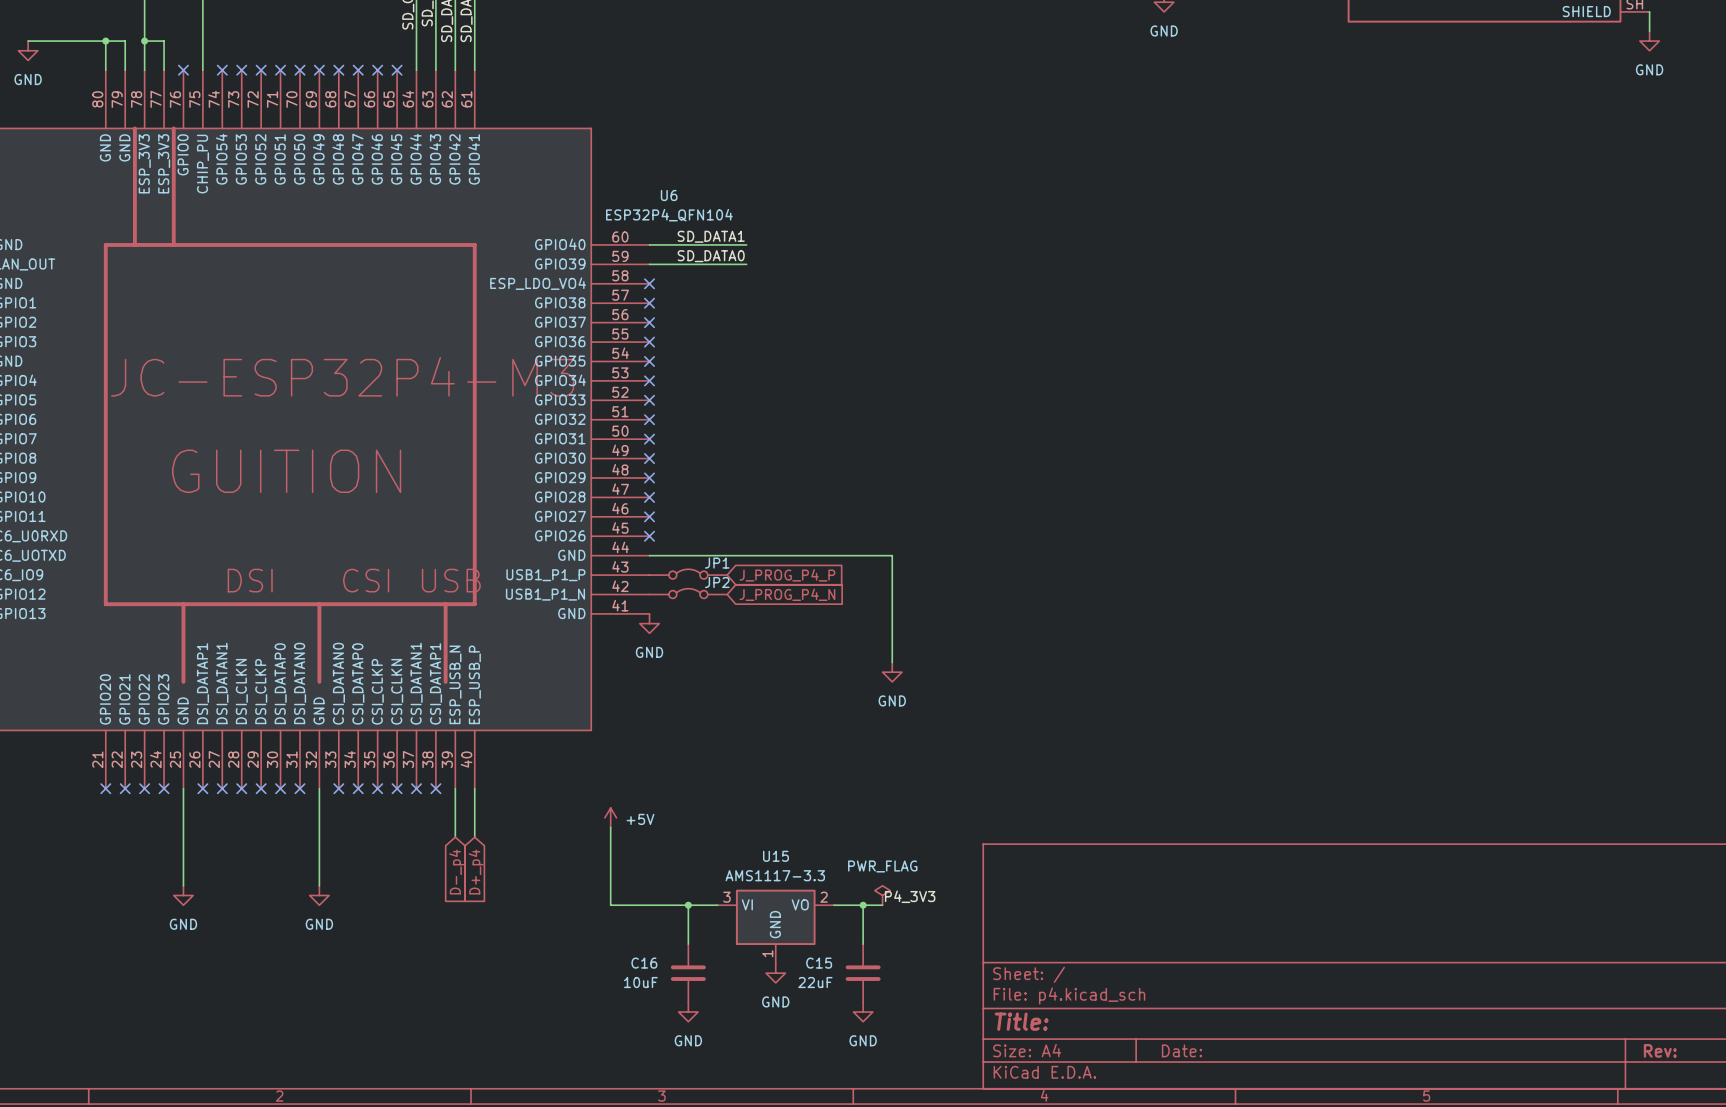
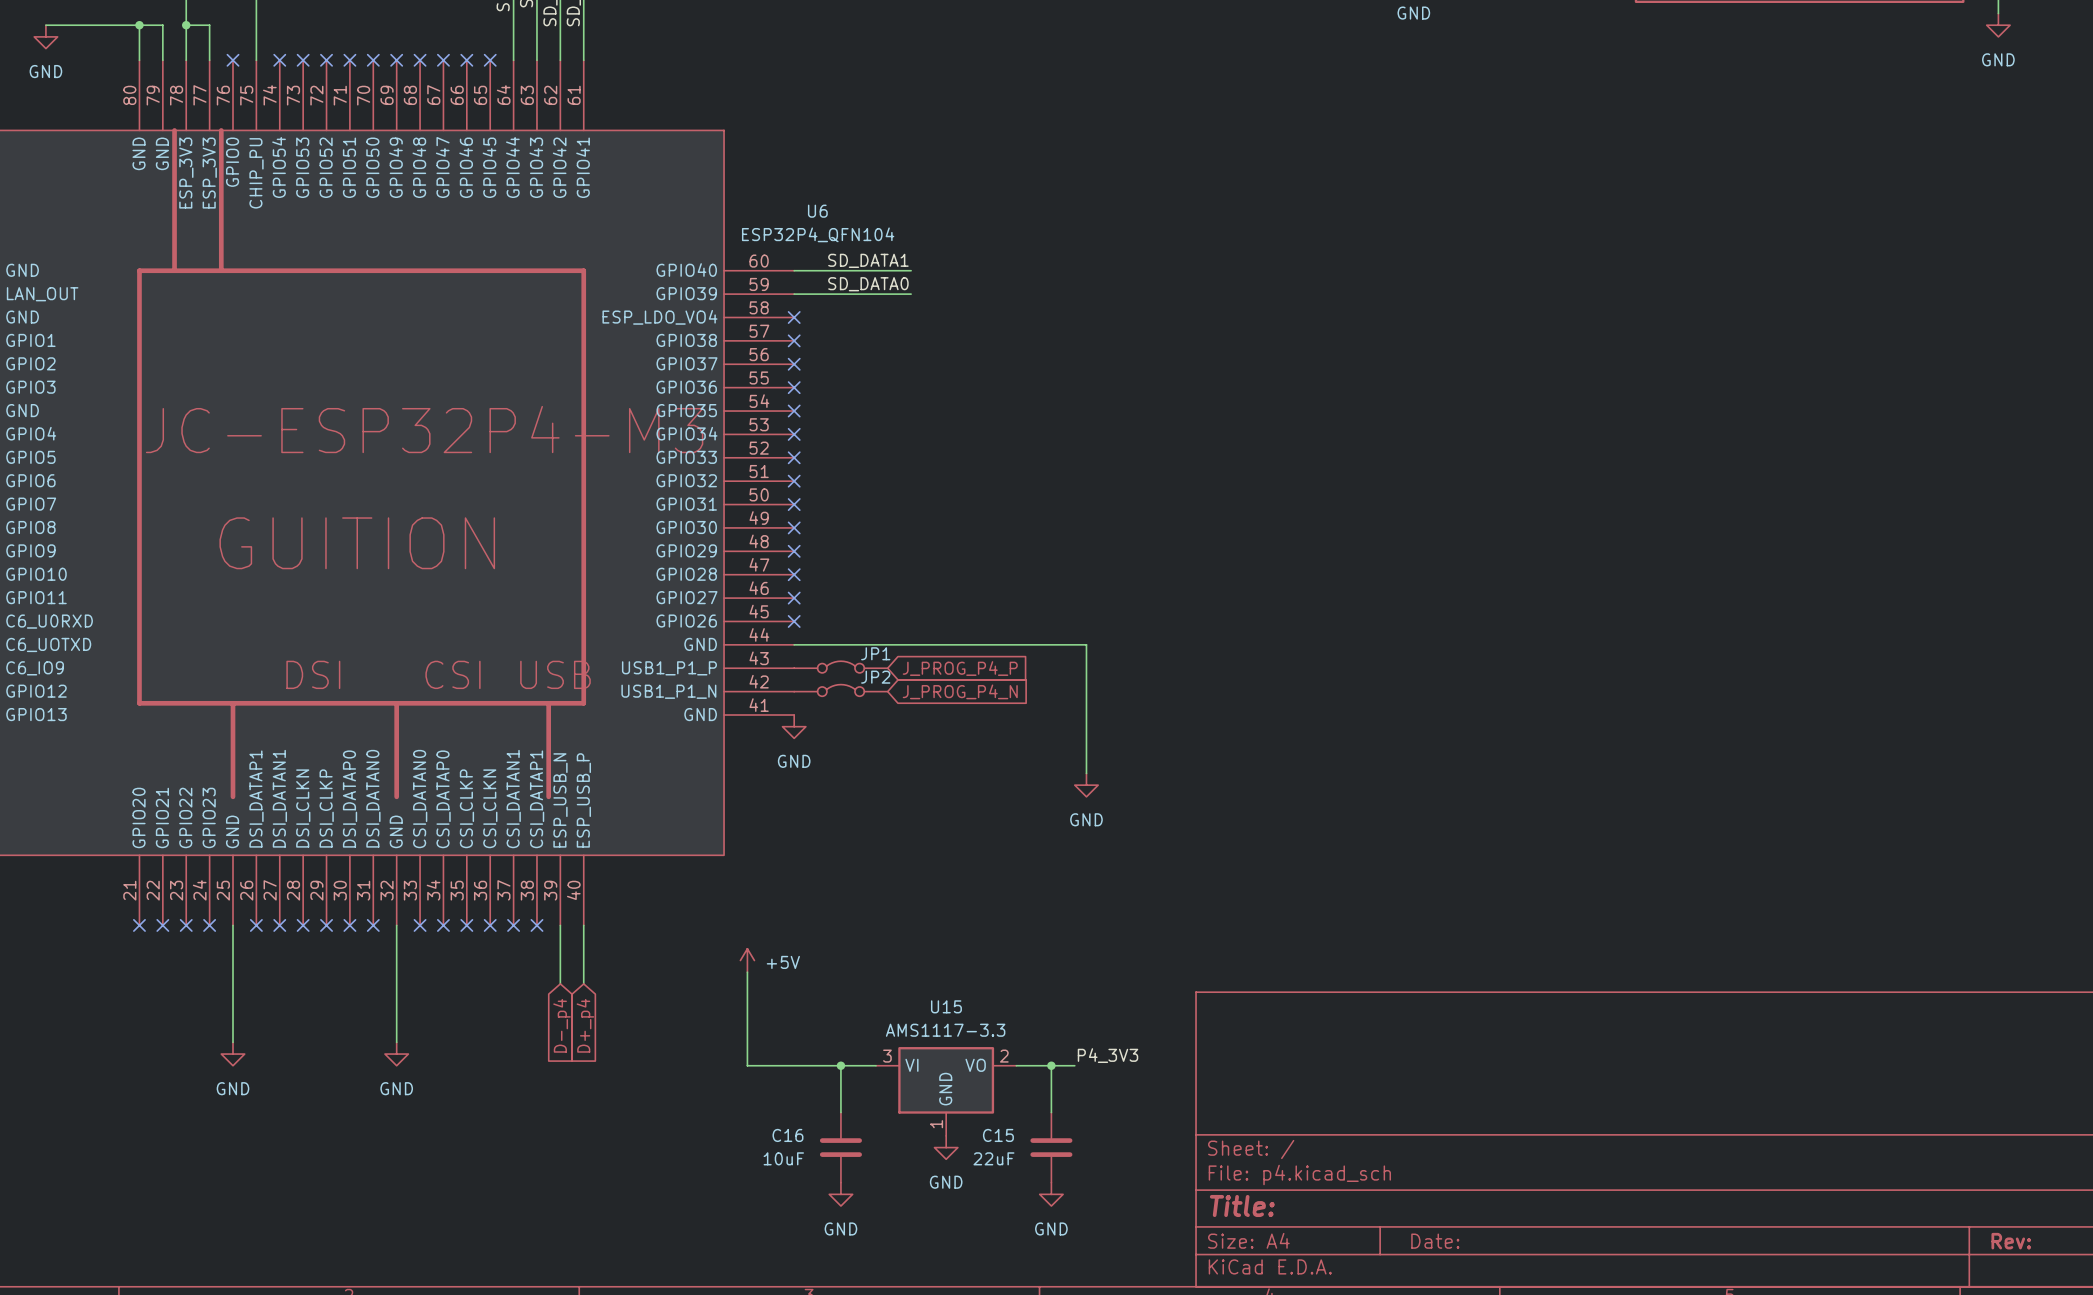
power symbol: PWR_FLAG (882, 895) -> none

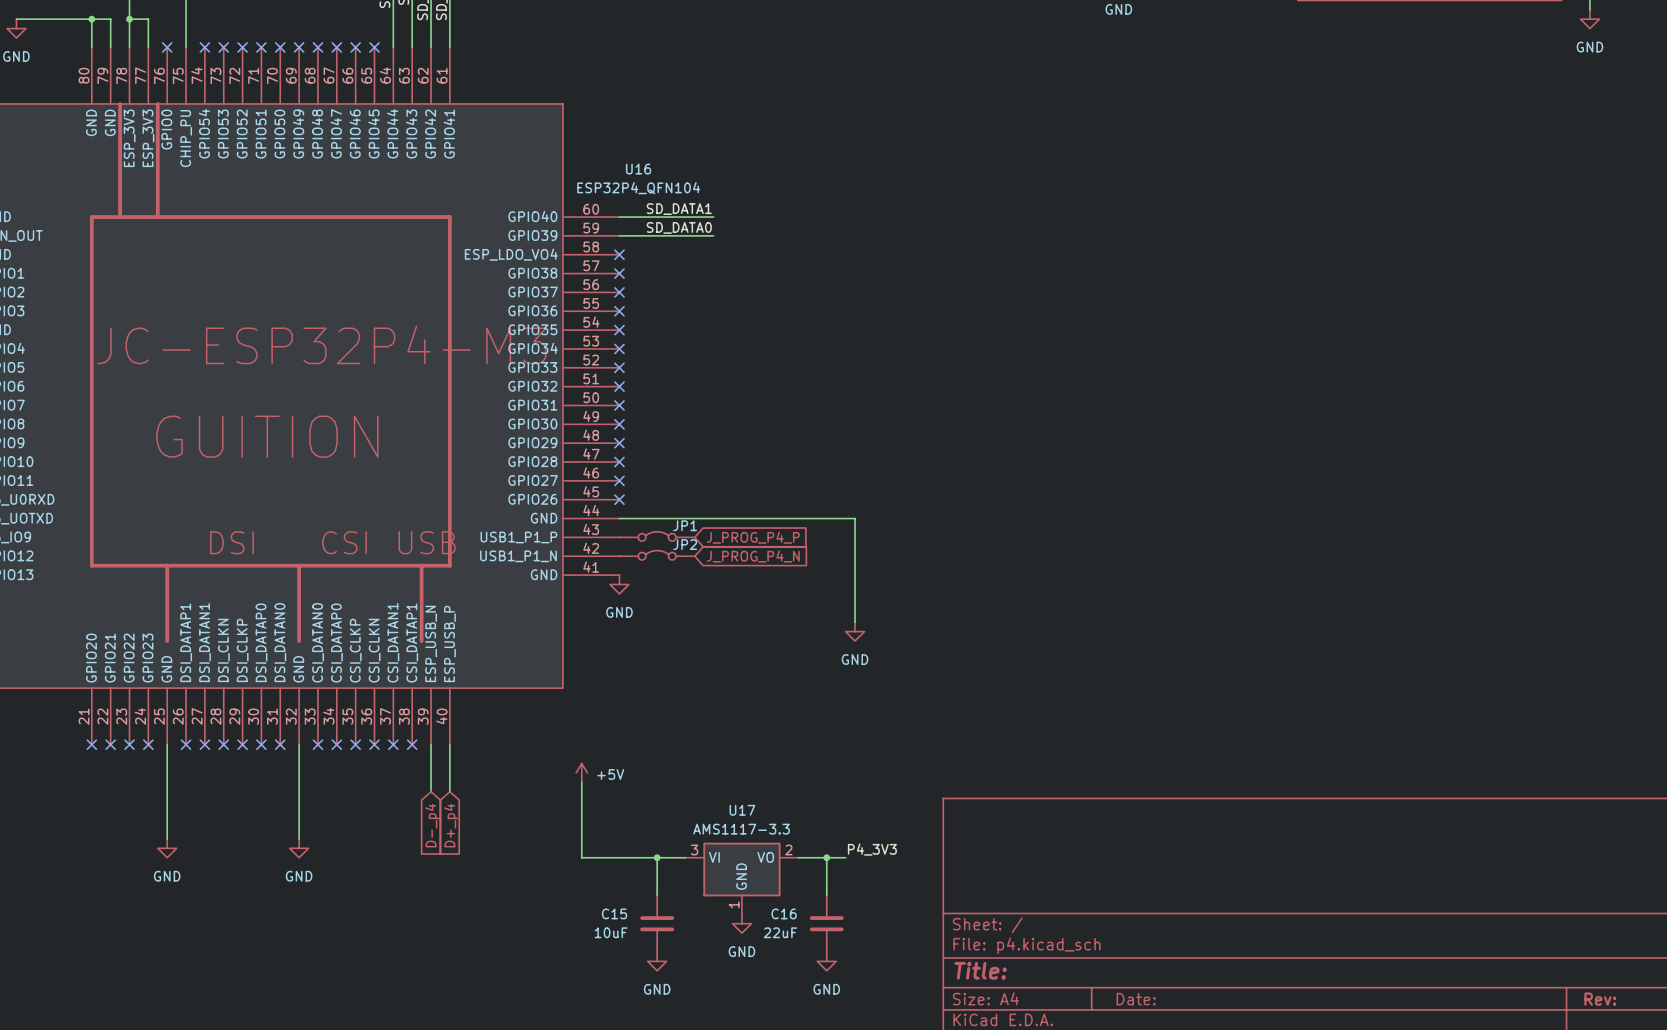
U6 name: U6 (817, 211) -> U16 (638, 169)
U15 name: U15 (946, 1006) -> U17 (742, 810)
C16 name: C16 (787, 1135) -> C15 (614, 913)
C15 name: C15 (998, 1135) -> C16 (784, 913)

